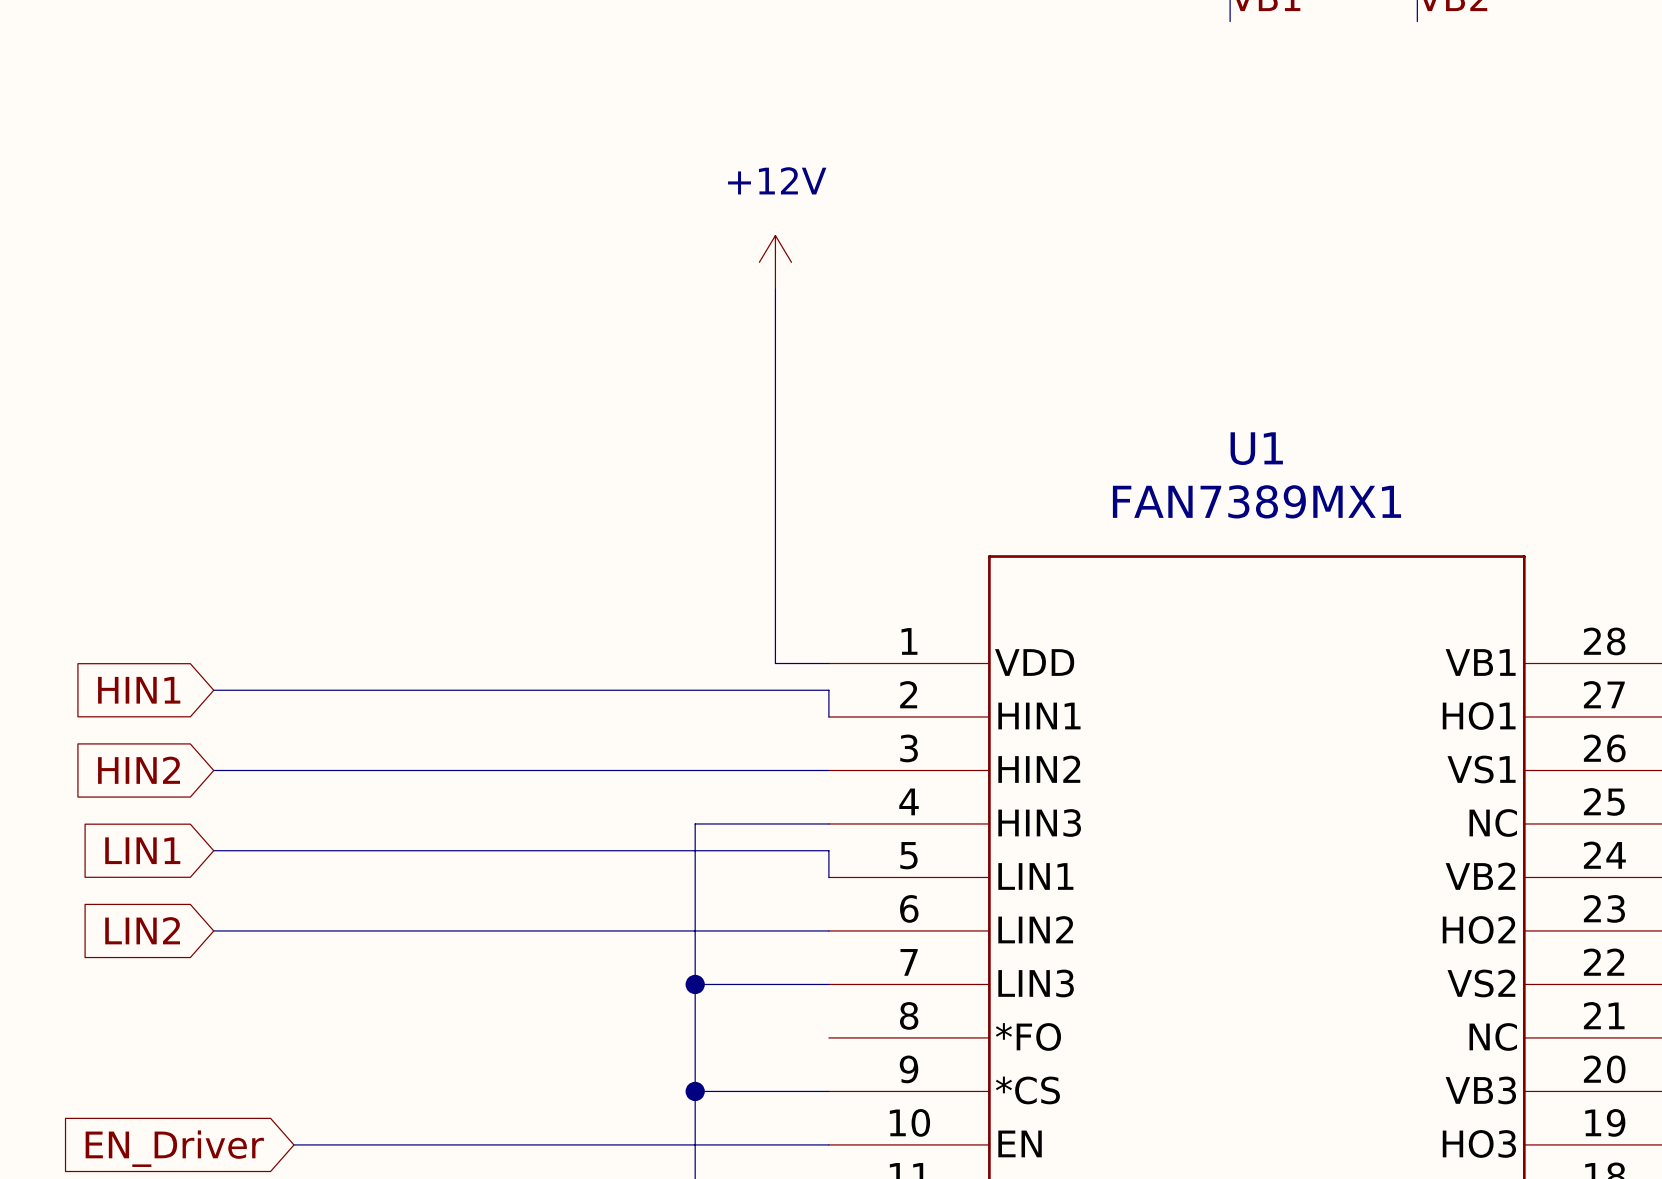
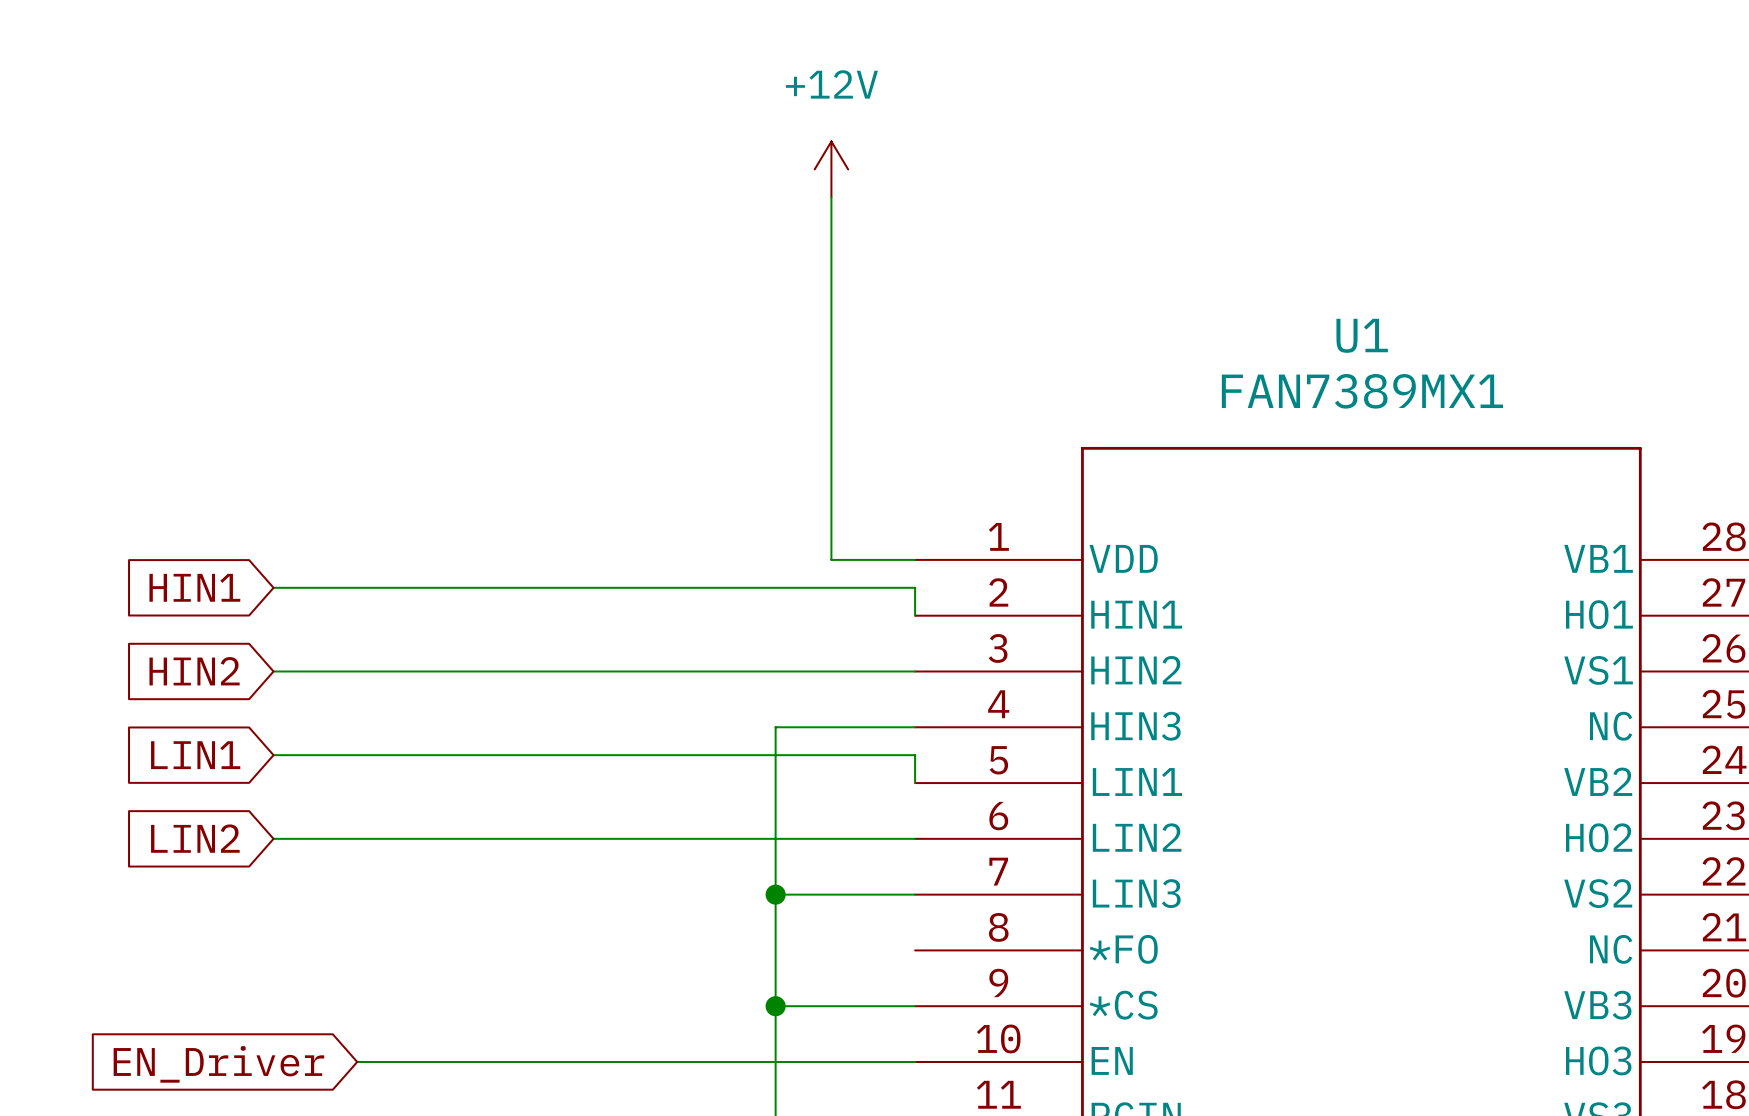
power symbol position: +12V (775, 262) -> +12V (831, 169)
wire: (775, 289) (775, 663) -> (831, 197) (831, 559) (859, 559)

